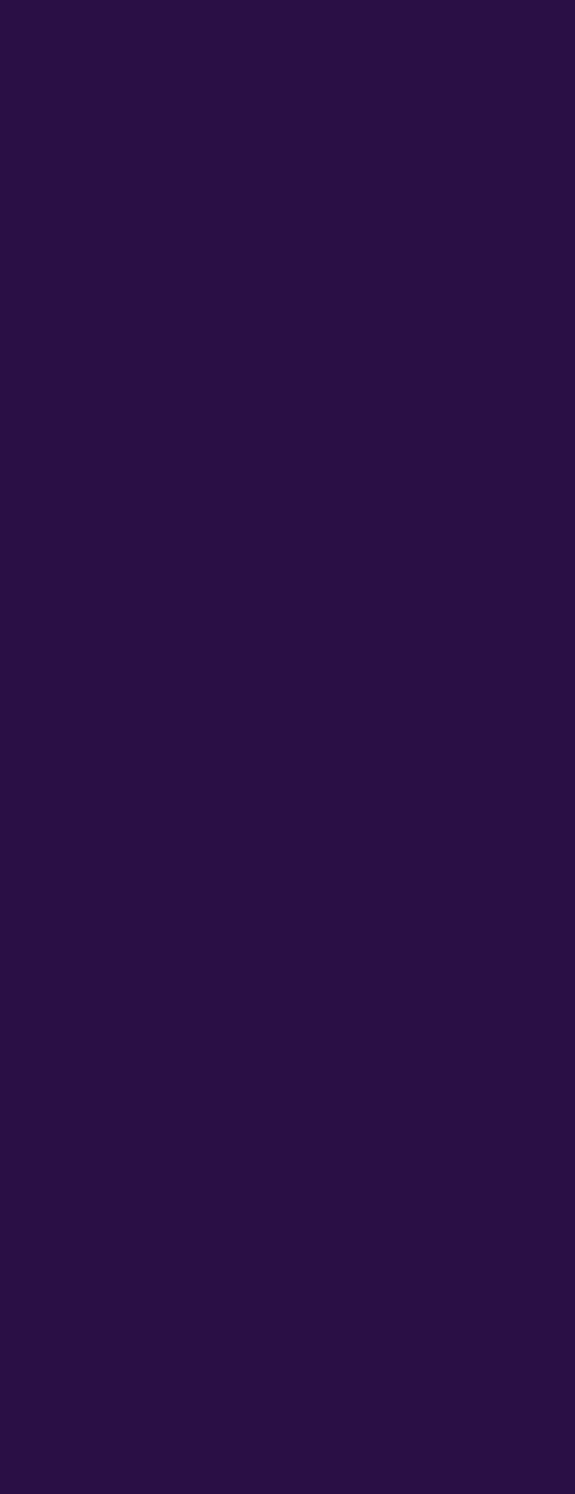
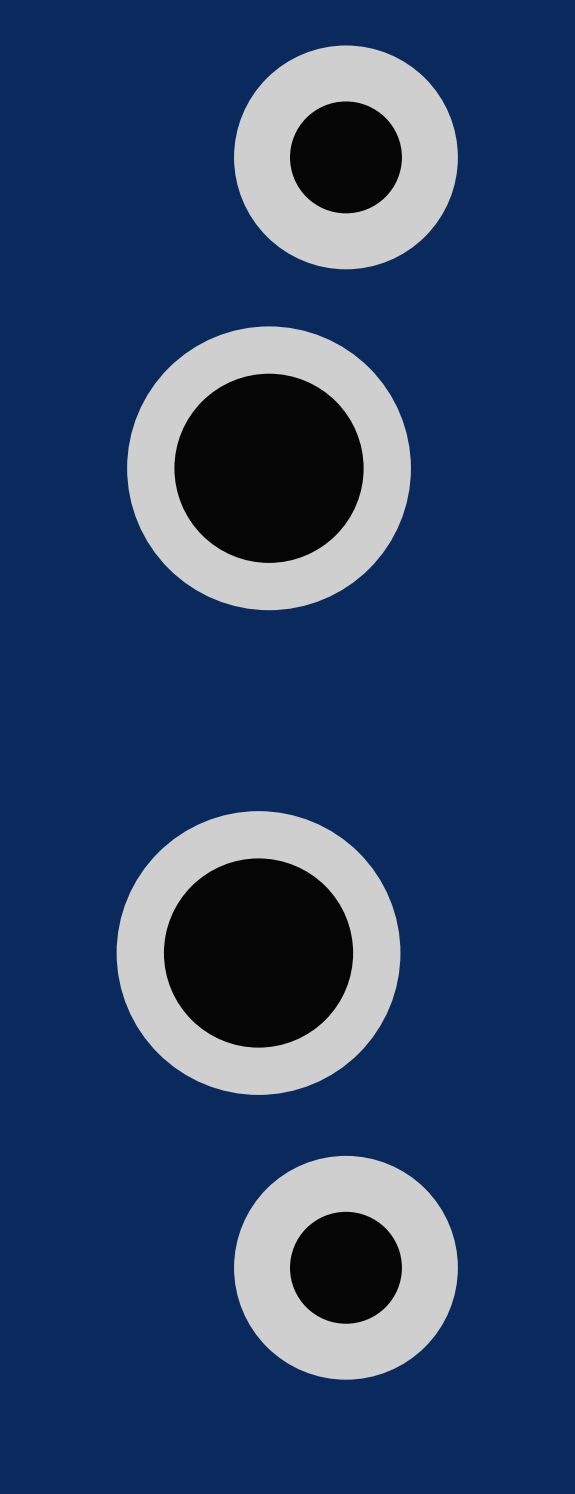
part: none -> (345, 157)
part: none -> (269, 468)
part: none -> (258, 953)
part: none -> (345, 1267)

